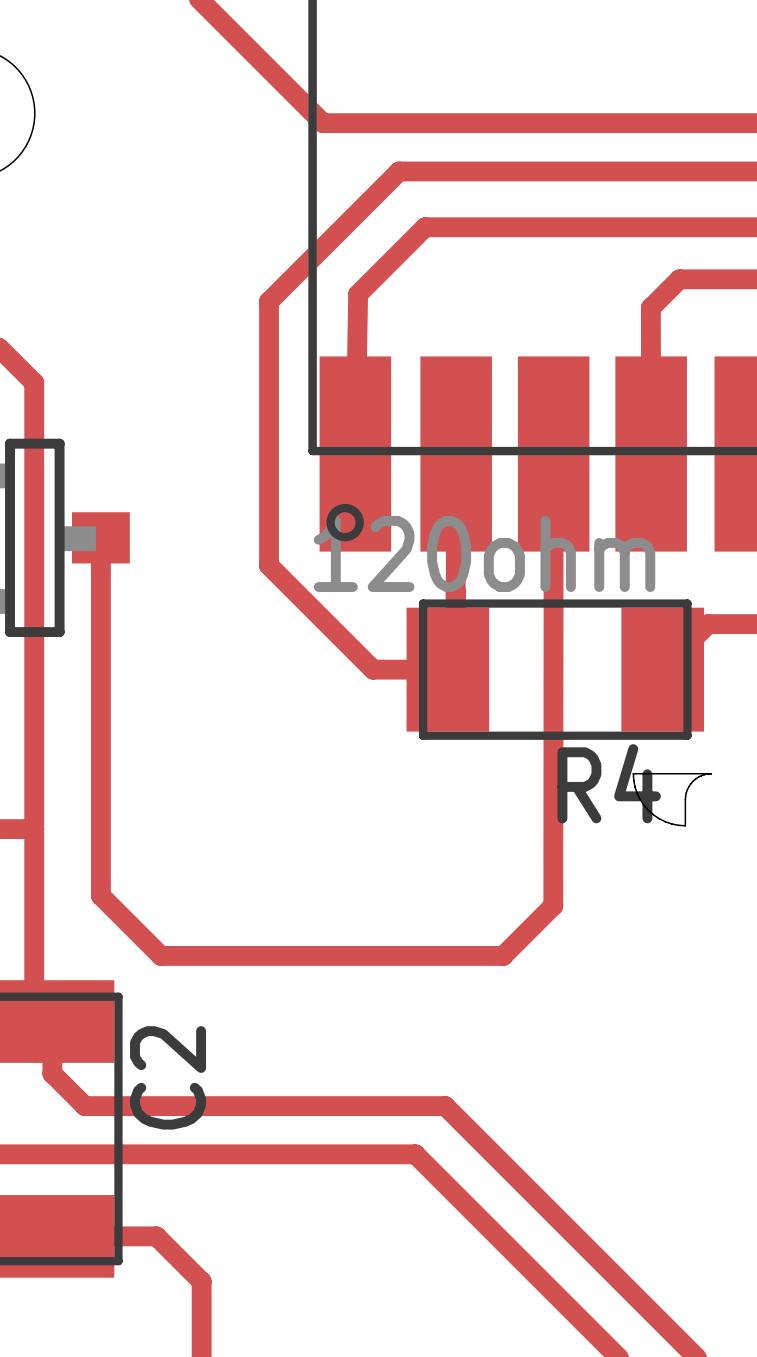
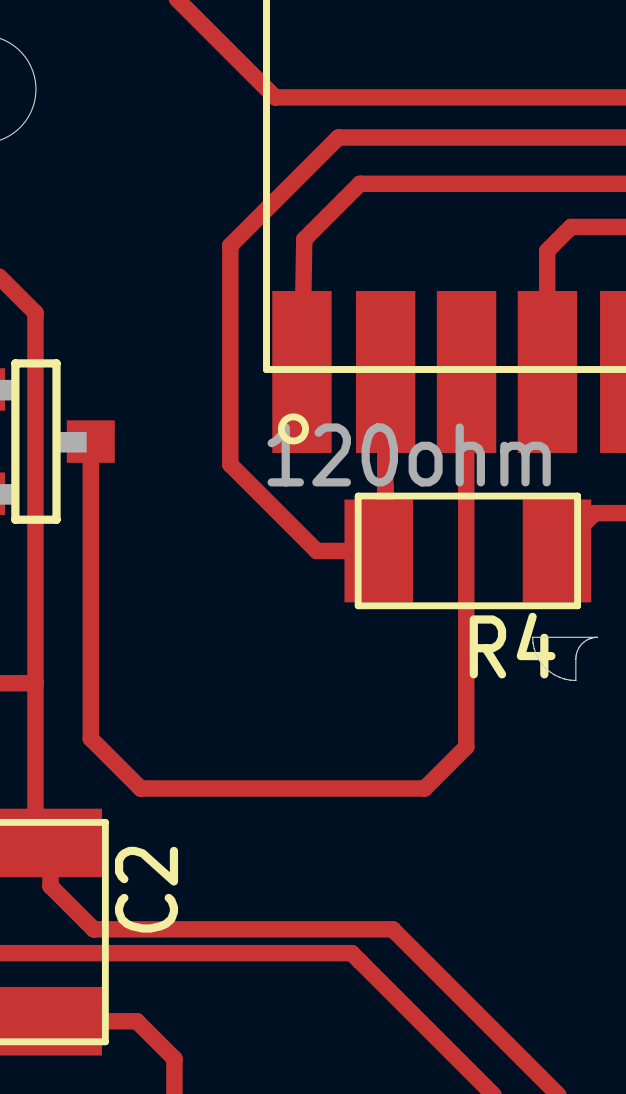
track: (553, 454) (553, 905) -> (466, 358) (466, 746)
track: (84, 1106) (445, 1106) (464, 1125) -> (77, 913) (93, 929) (392, 929)

